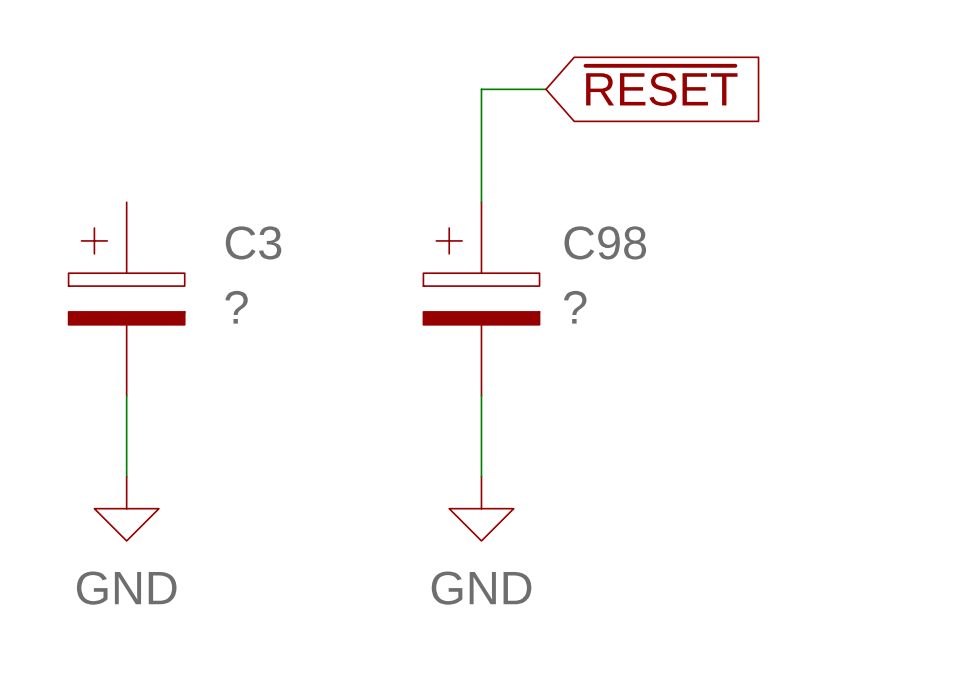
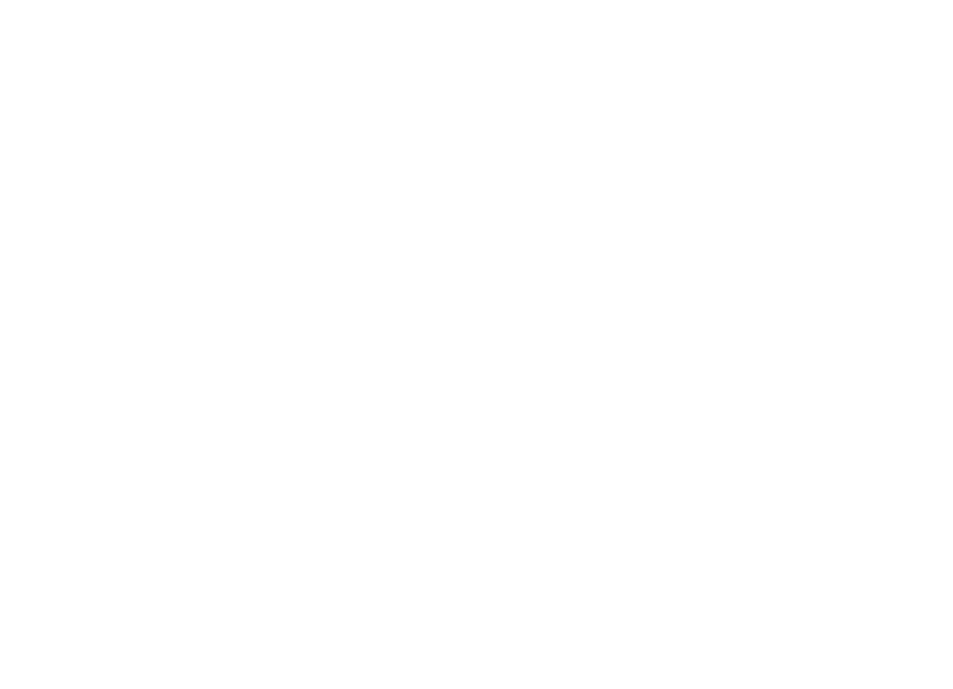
global label: ~{RESET} (661, 85) -> none
wire: (545, 89) (481, 89) (481, 202) -> none
C3: ? (126, 299) -> none
C98: ? (481, 299) -> none
wire: (126, 395) (126, 476) -> none
wire: (481, 395) (481, 476) -> none
power symbol: GND (126, 508) -> none
power symbol: GND (481, 508) -> none

